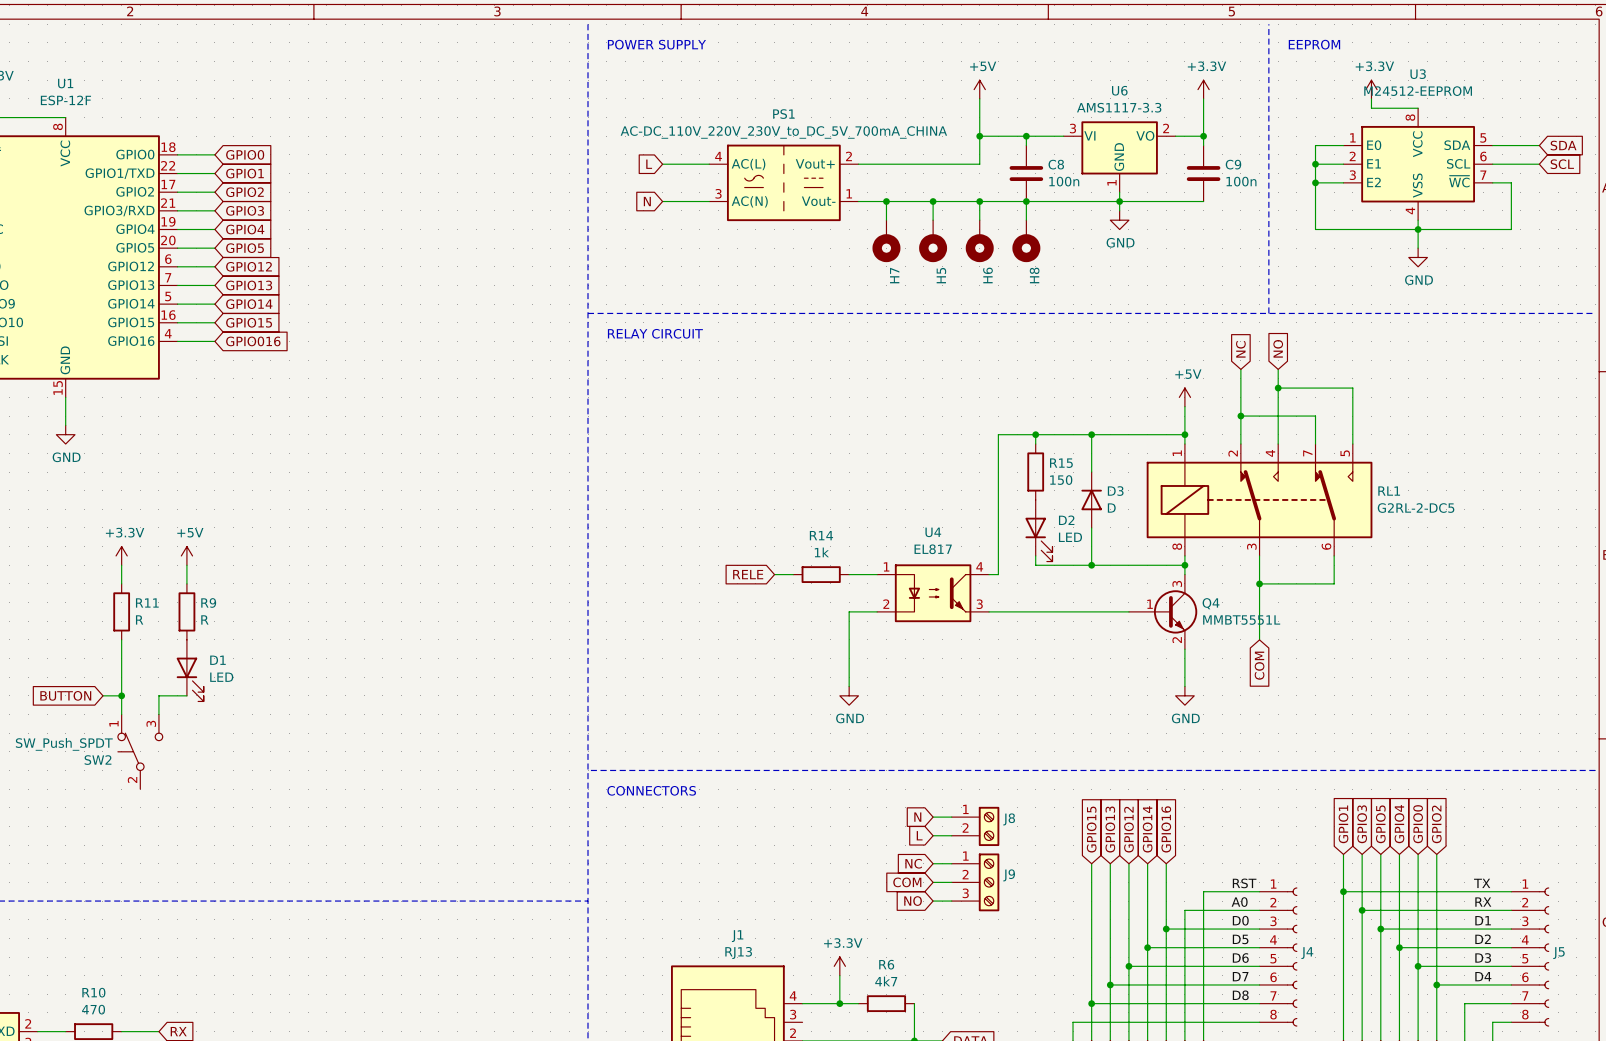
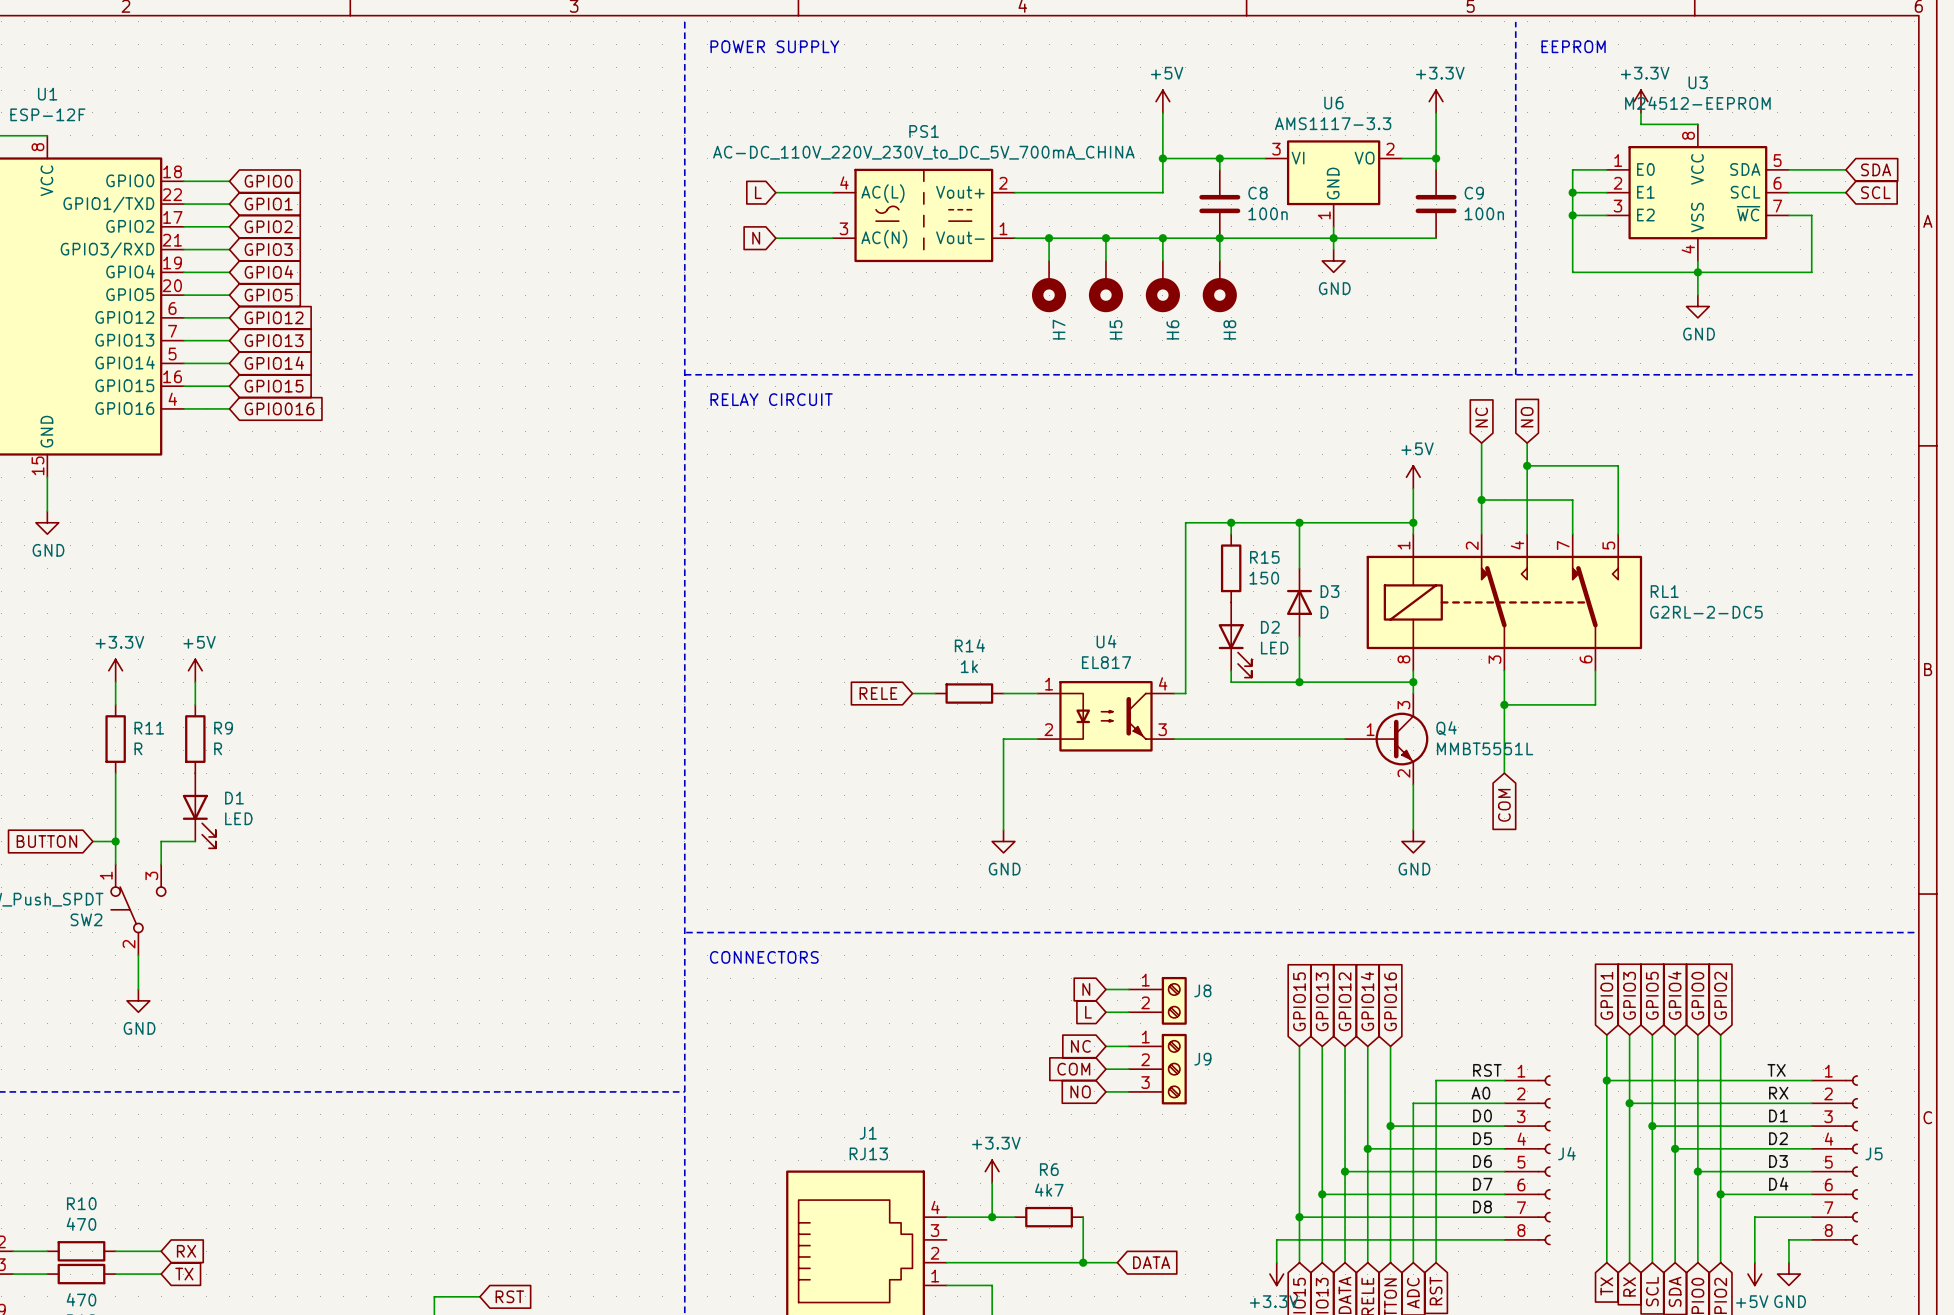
wire: none -> (138, 955) (138, 989)
power symbol: none -> GND (138, 1000)

